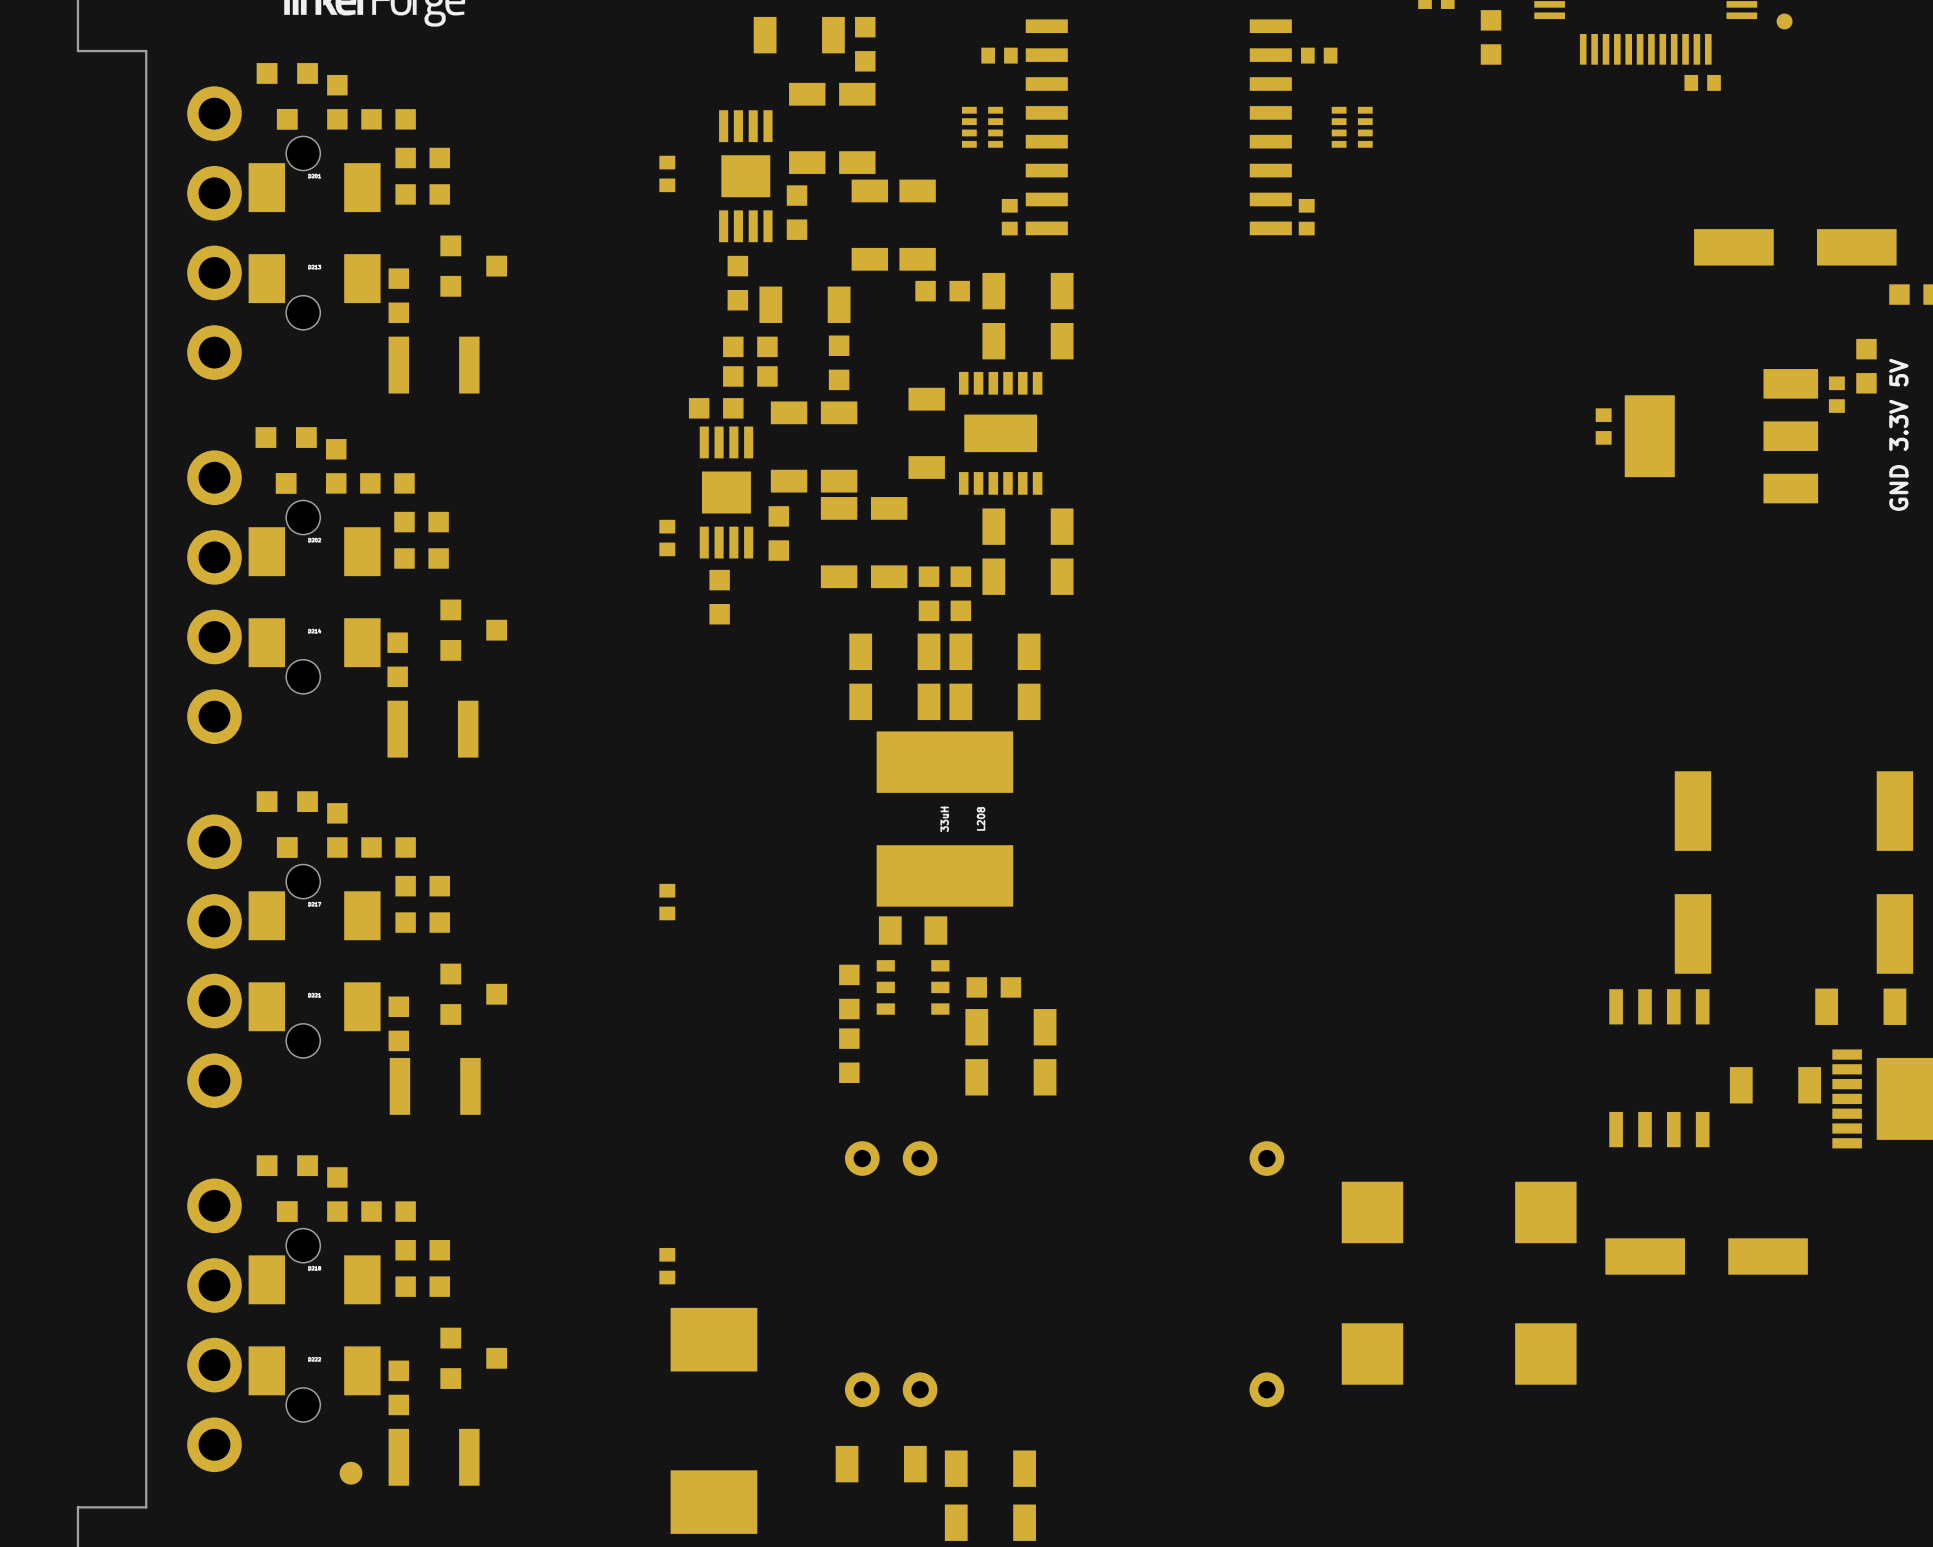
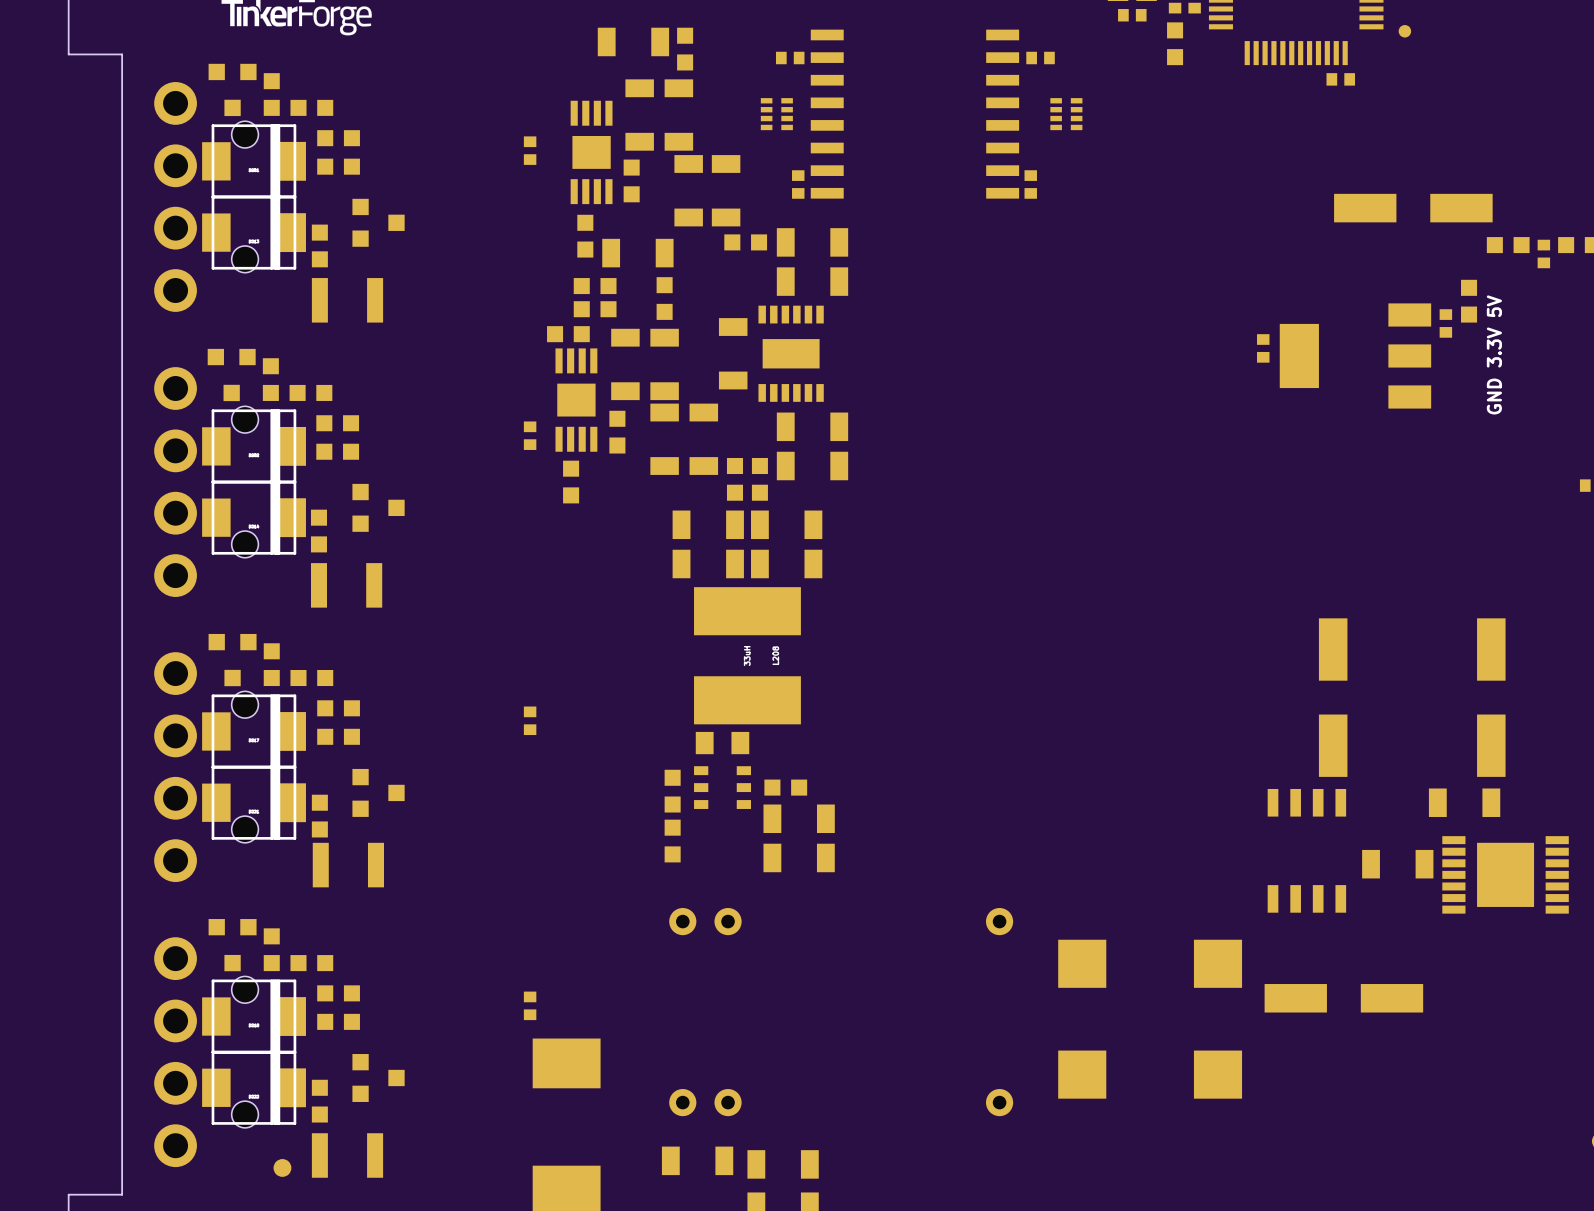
part footprint: [248, 163, 381, 213] -> [202, 124, 306, 199]
part footprint: [248, 254, 381, 304] -> [202, 195, 306, 270]
part footprint: [248, 527, 381, 577] -> [202, 409, 306, 484]
part footprint: [248, 618, 381, 668] -> [202, 480, 306, 555]
part footprint: [248, 891, 381, 941] -> [202, 694, 306, 769]
part footprint: [248, 982, 381, 1032] -> [202, 765, 306, 840]
part footprint: [248, 1255, 381, 1305] -> [202, 979, 306, 1054]
part footprint: [248, 1346, 381, 1396] -> [202, 1050, 306, 1125]

